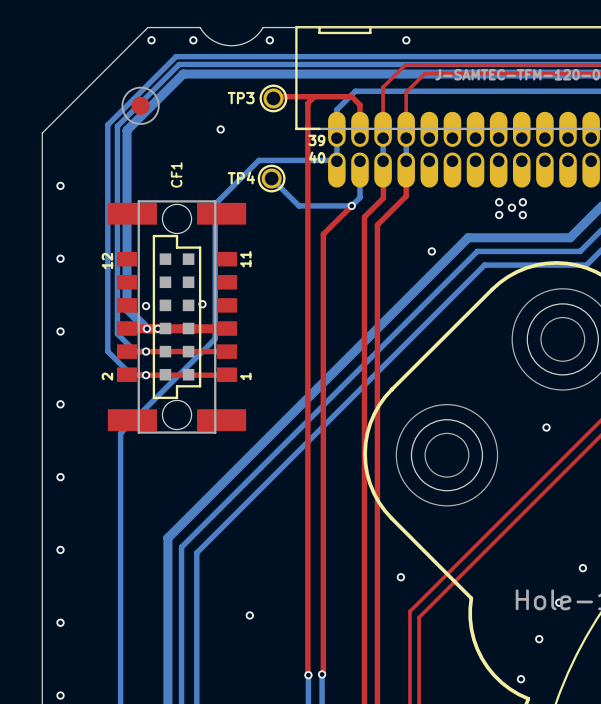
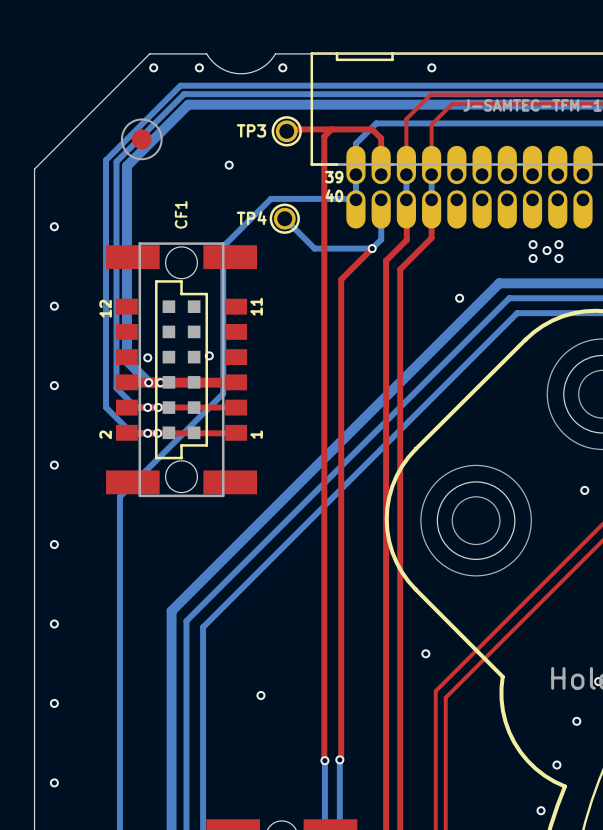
via: none -> (158, 407)
via: none -> (157, 433)

